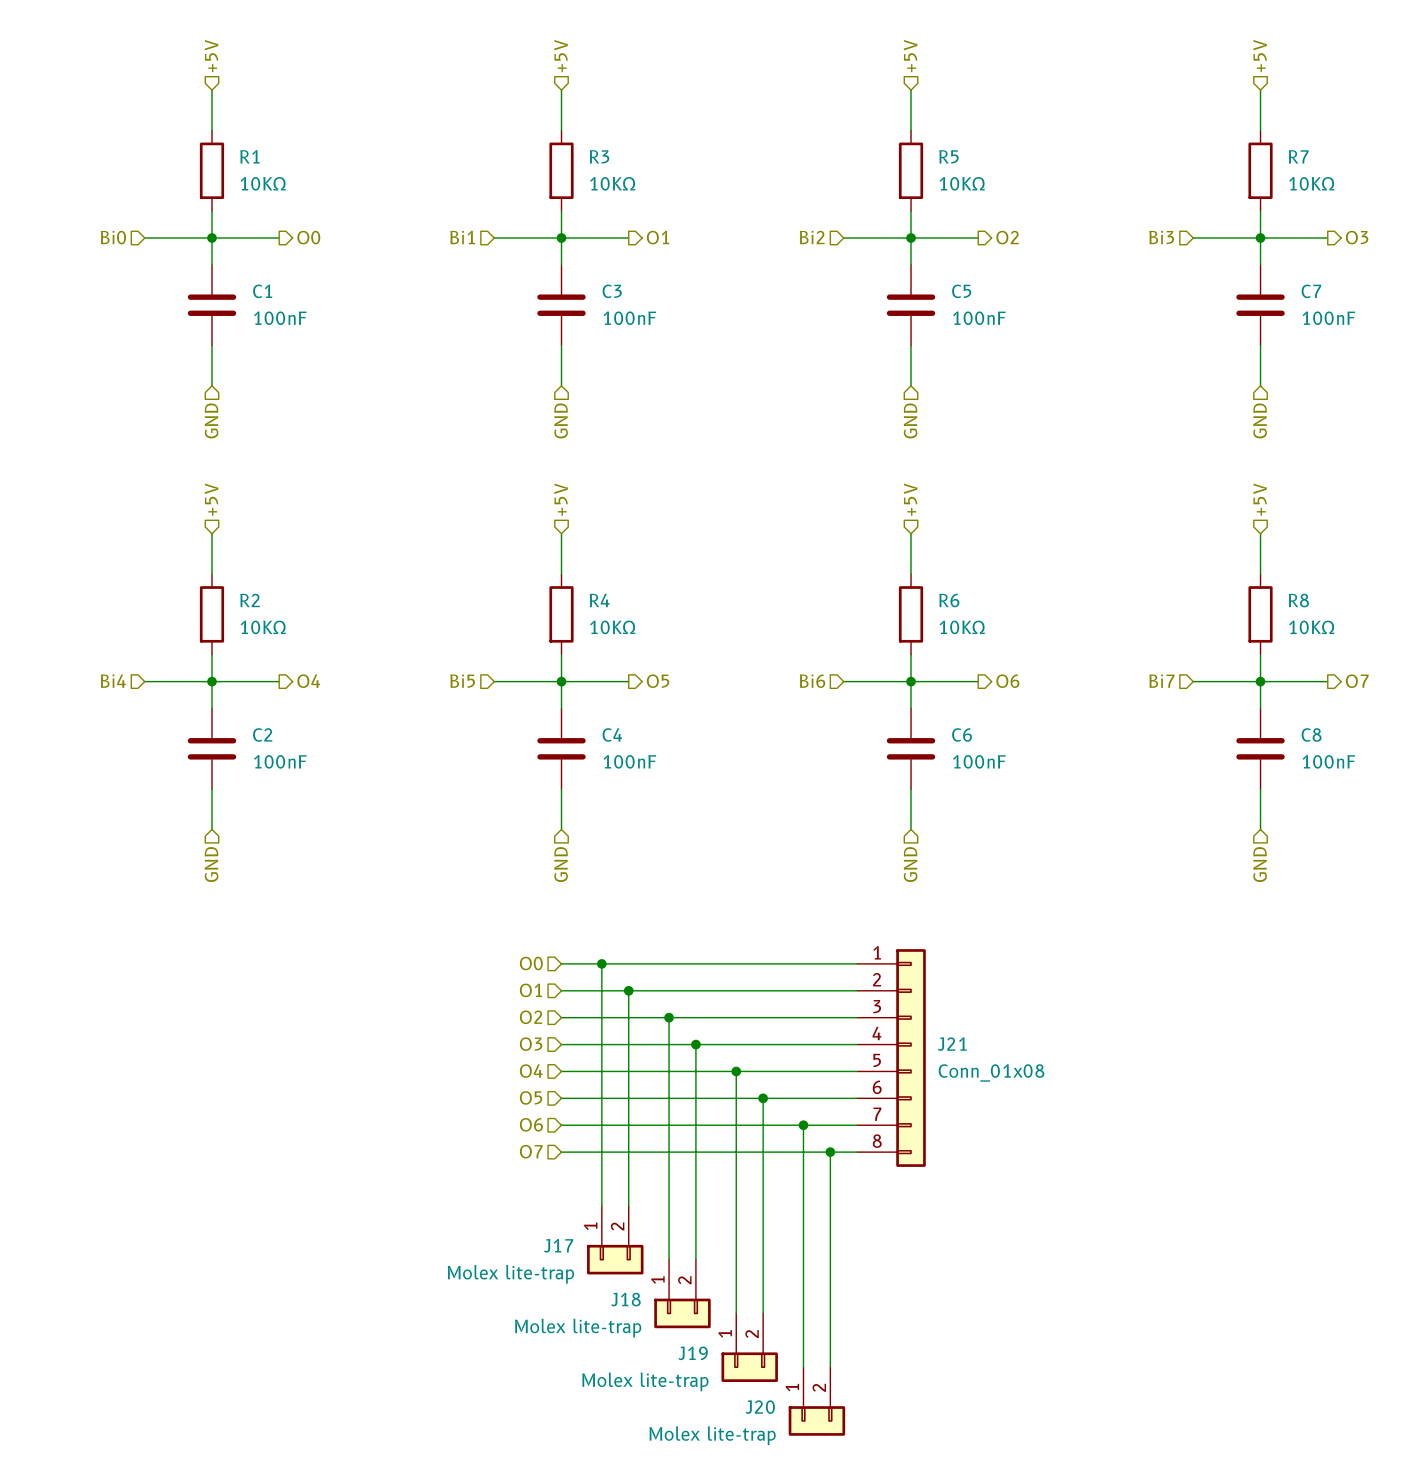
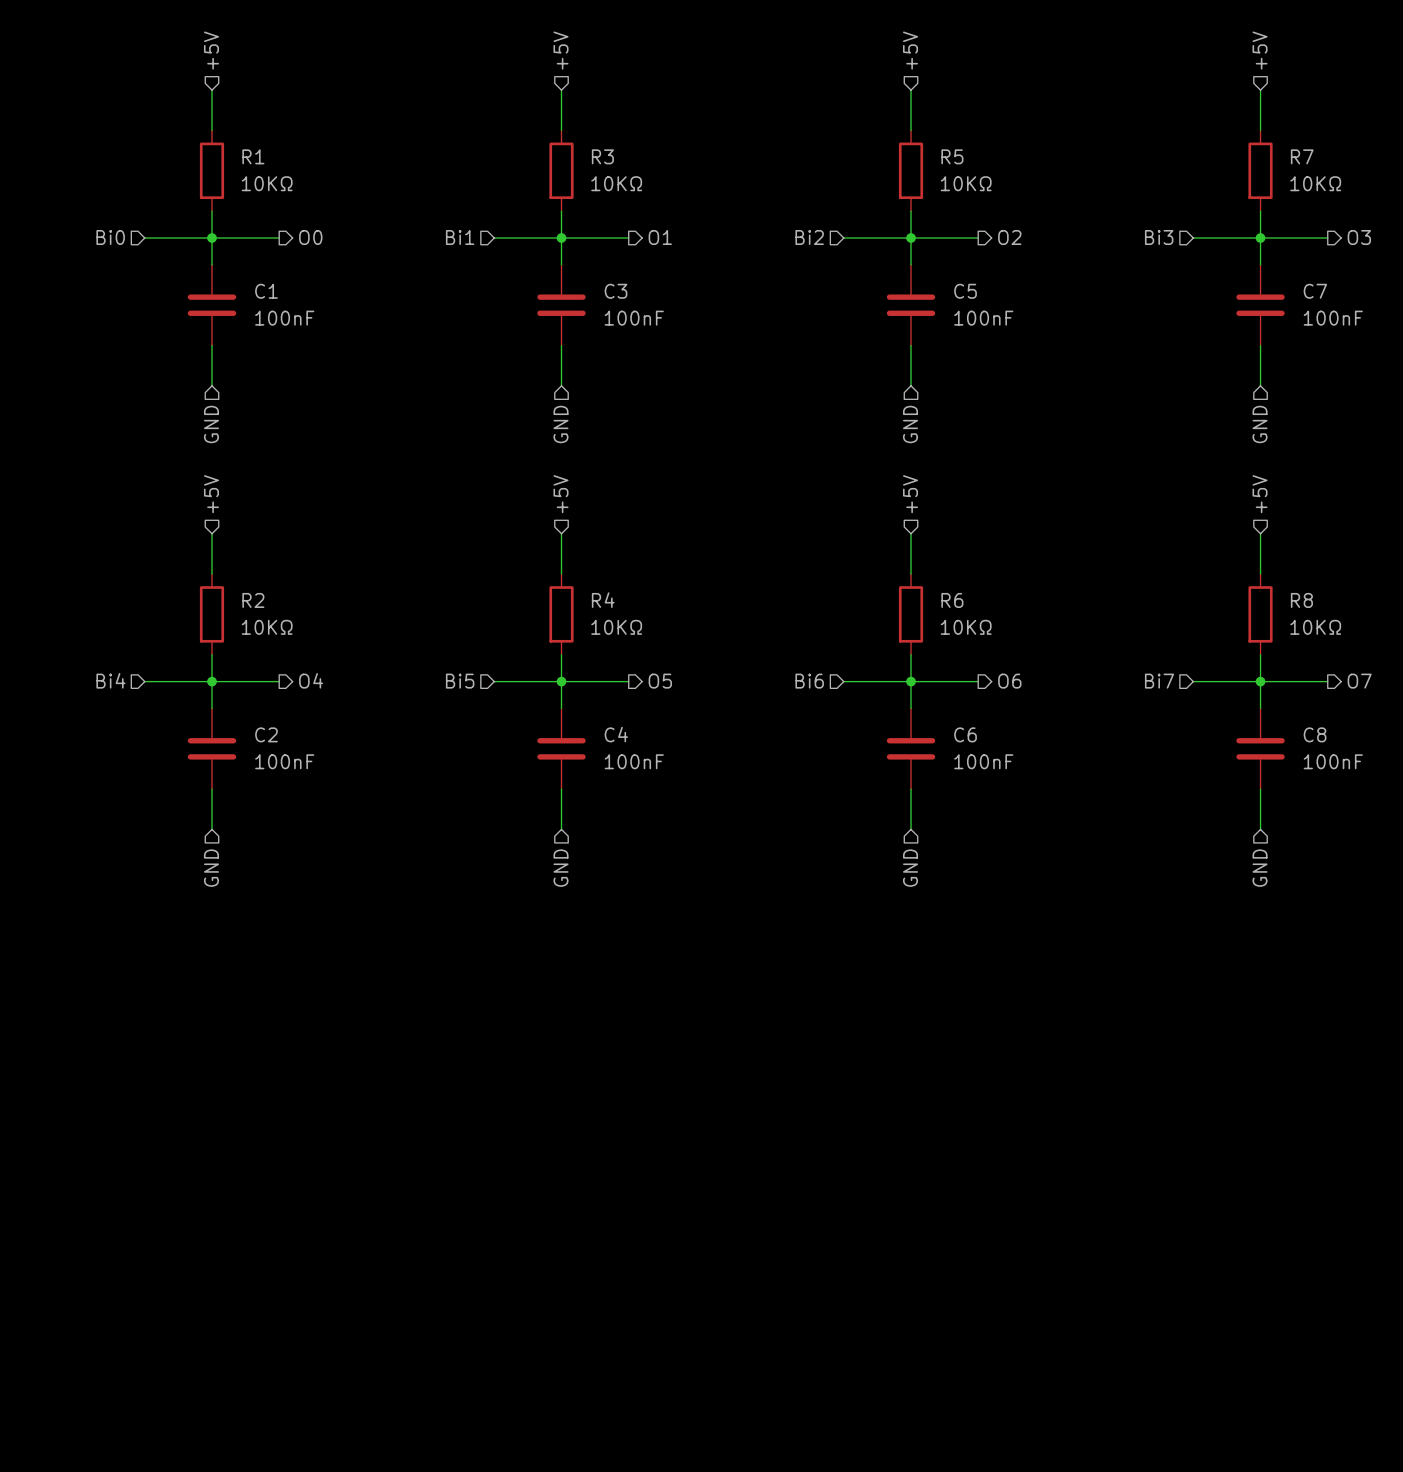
hierarchical label: O0 (531, 963) -> none
wire: (561, 963) (857, 963) -> none
wire: (601, 963) (601, 1205) -> none
junction: (601, 963) -> none
hierarchical label: O1 (531, 990) -> none
wire: (561, 990) (857, 990) -> none
wire: (628, 990) (628, 1205) -> none
junction: (628, 990) -> none
hierarchical label: O2 (531, 1017) -> none
wire: (561, 1017) (857, 1017) -> none
wire: (669, 1017) (669, 1259) -> none
junction: (669, 1017) -> none
hierarchical label: O3 (531, 1044) -> none
wire: (561, 1044) (857, 1044) -> none
wire: (695, 1044) (695, 1259) -> none
junction: (695, 1044) -> none
J21: Conn_01x08 (891, 1058) -> none
hierarchical label: O4 (531, 1071) -> none
wire: (561, 1071) (857, 1071) -> none
wire: (736, 1071) (736, 1313) -> none
junction: (736, 1071) -> none
hierarchical label: O5 (531, 1097) -> none
wire: (561, 1098) (857, 1098) -> none
wire: (763, 1098) (763, 1313) -> none
junction: (763, 1098) -> none
hierarchical label: O6 (531, 1124) -> none
wire: (561, 1125) (857, 1125) -> none
wire: (803, 1125) (803, 1367) -> none
junction: (803, 1125) -> none
hierarchical label: O7 (531, 1151) -> none
wire: (561, 1152) (857, 1152) -> none
wire: (830, 1152) (830, 1367) -> none
junction: (830, 1152) -> none
J17: Molex lite-trap (615, 1240) -> none
J18: Molex lite-trap (682, 1293) -> none
J19: Molex lite-trap (749, 1347) -> none
J20: Molex lite-trap (816, 1401) -> none

